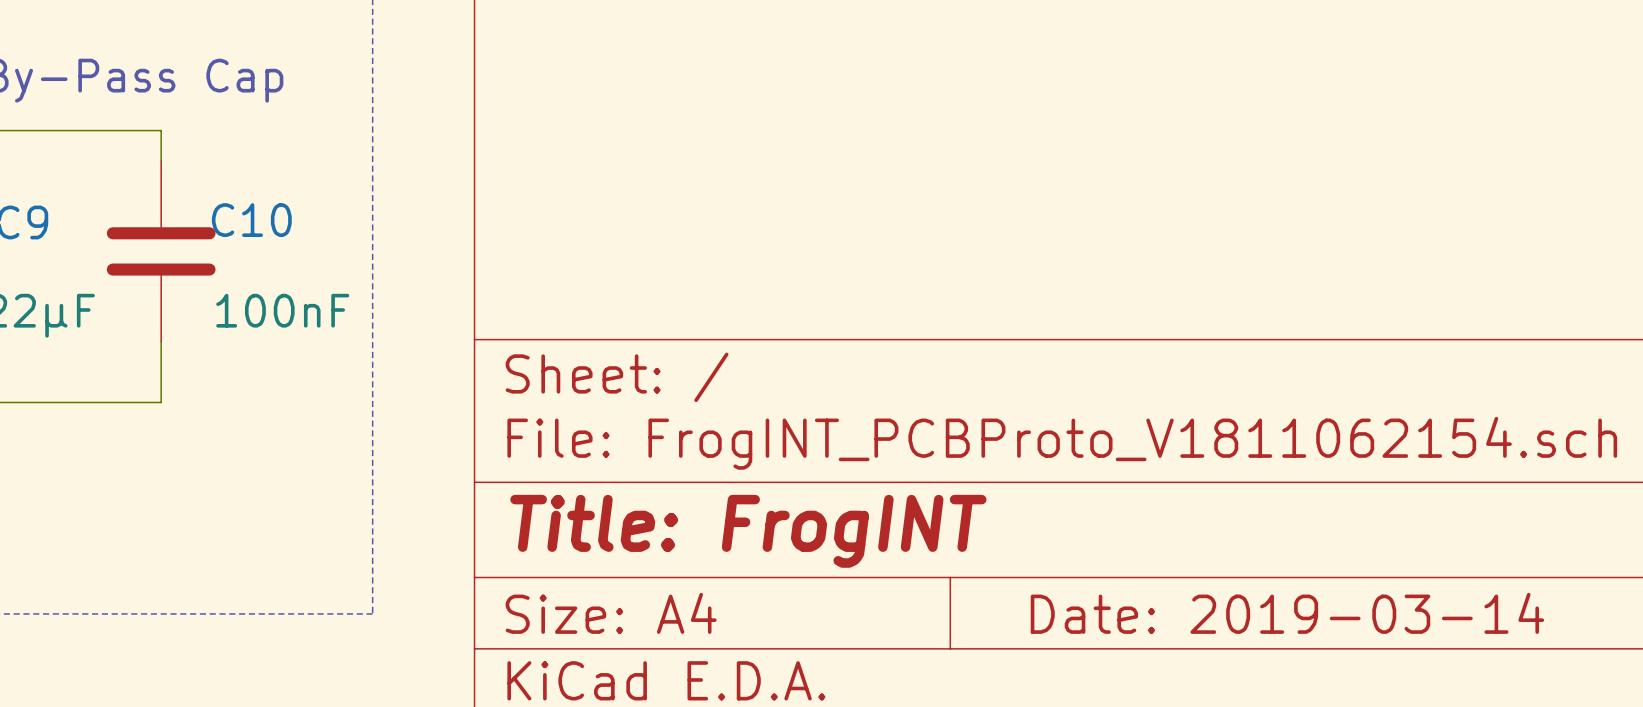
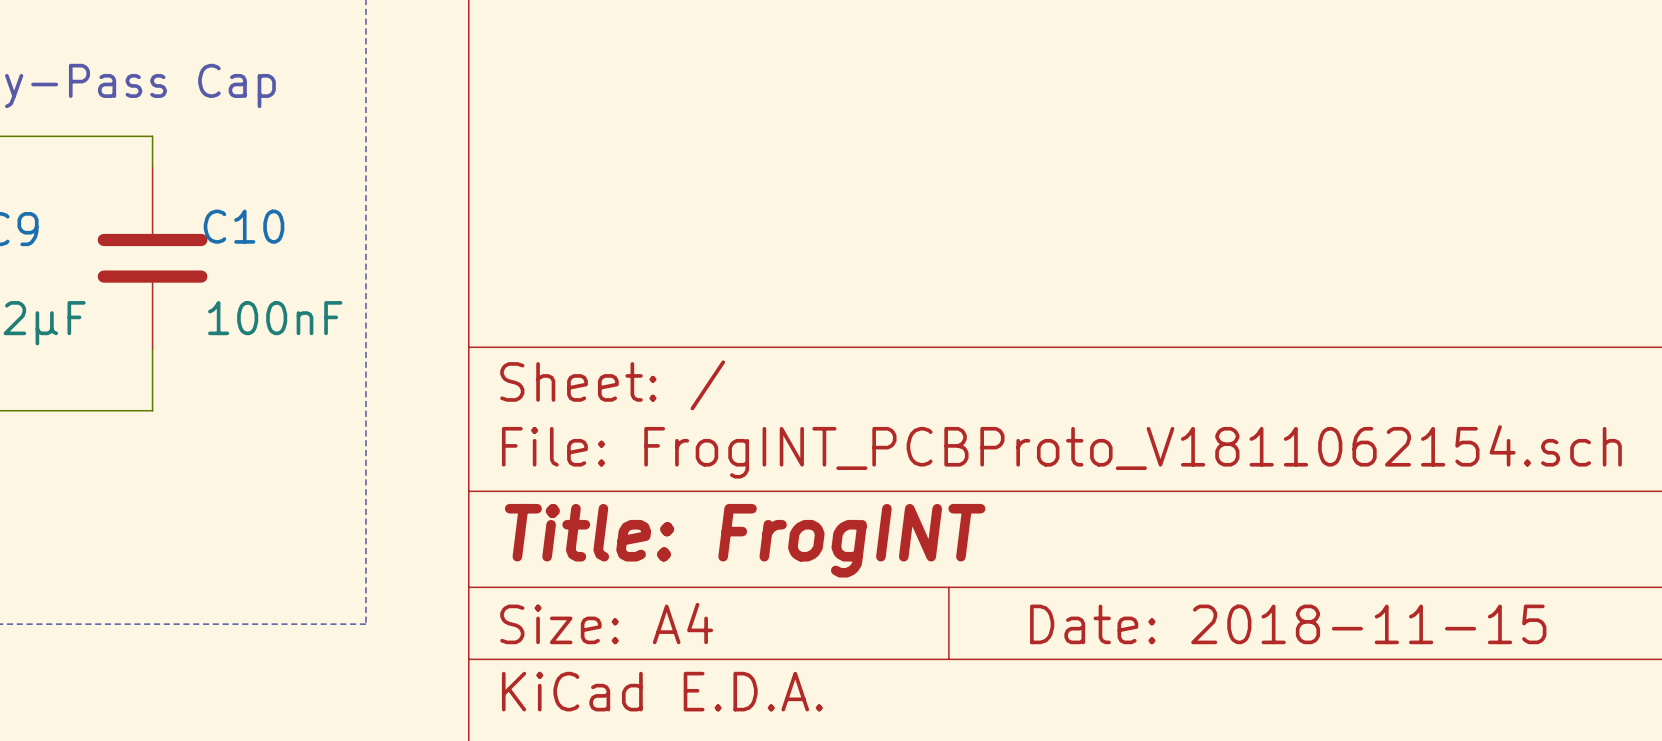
title block: Date: 2019-03-14 (1287, 613) -> Date: 2018-11-15 (1288, 624)

